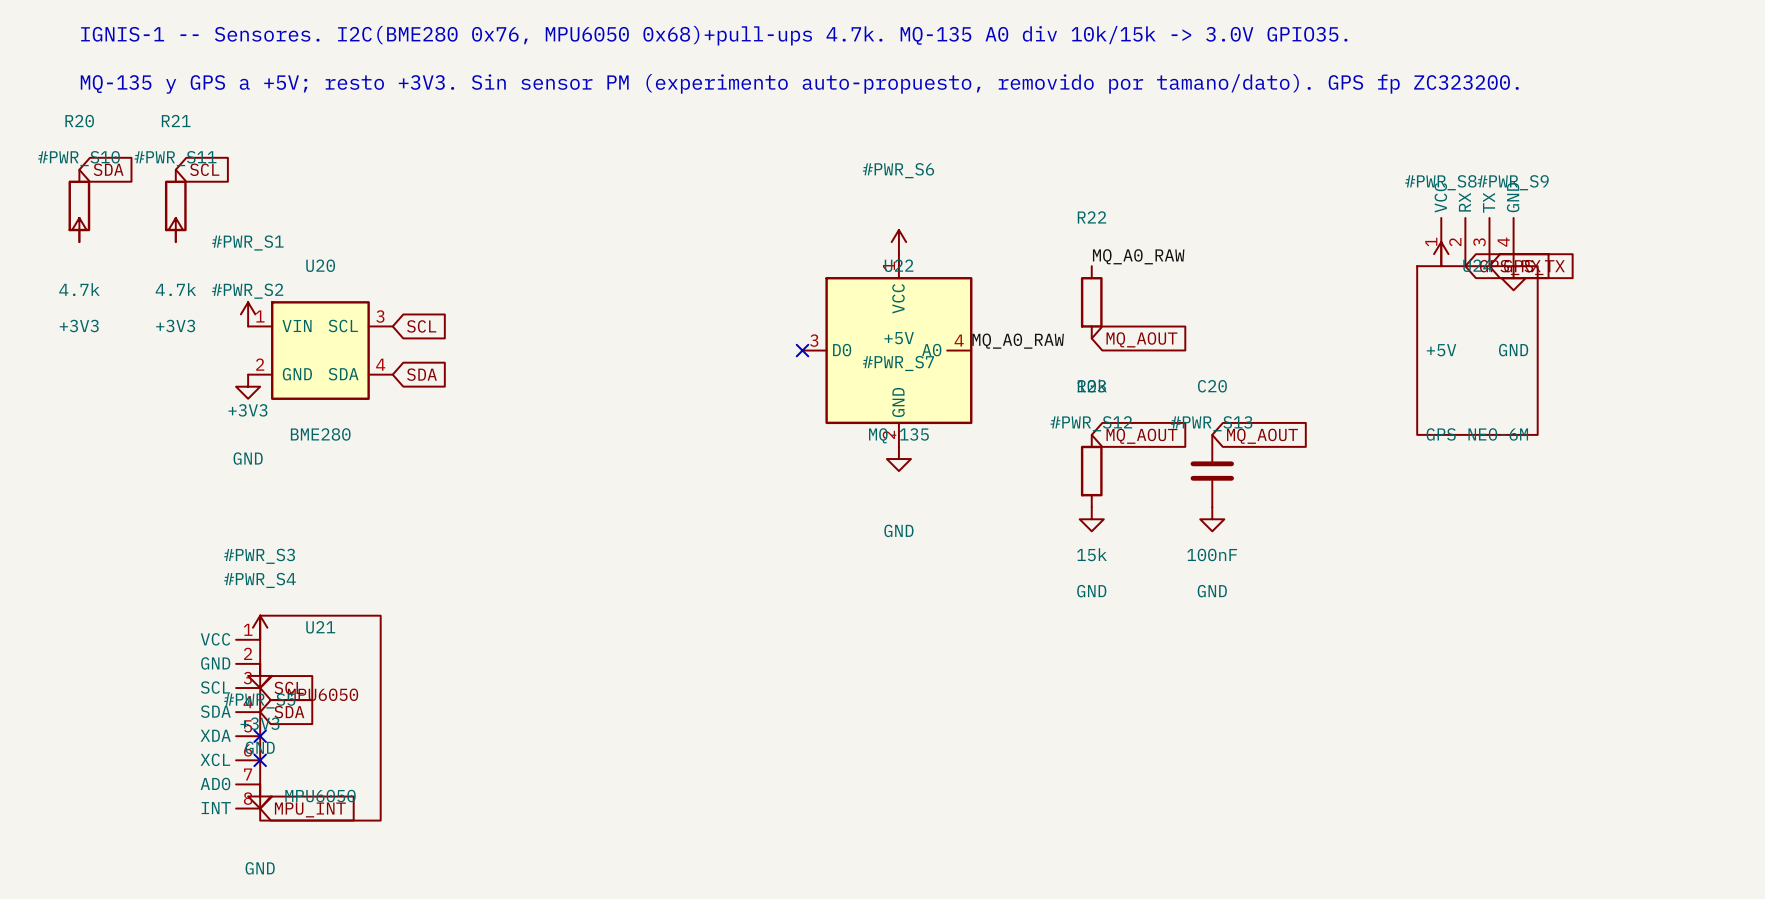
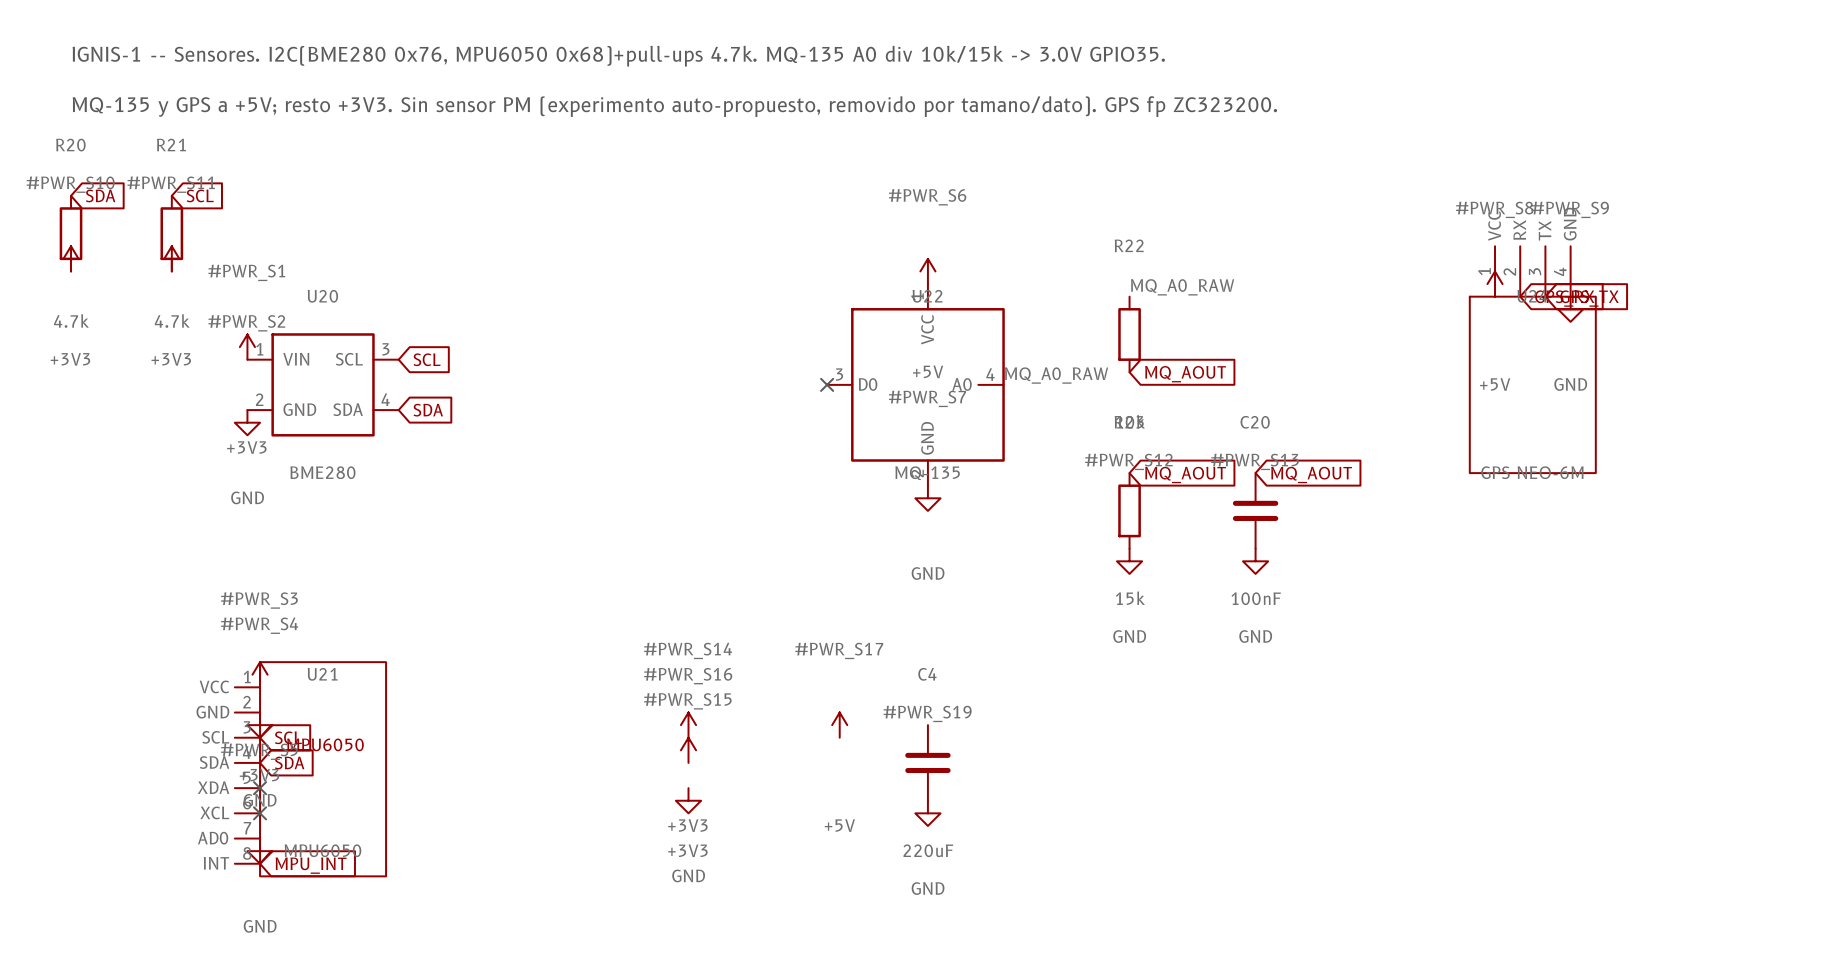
#PWR_S14: none -> +3V3 (688, 725)
#PWR_S17: none -> +5V (839, 725)
#PWR_S16: none -> +3V3 (688, 750)
C4: none -> 220uF (927, 762)
#PWR_S15: none -> GND (688, 800)
#PWR_S19: none -> GND (927, 813)

